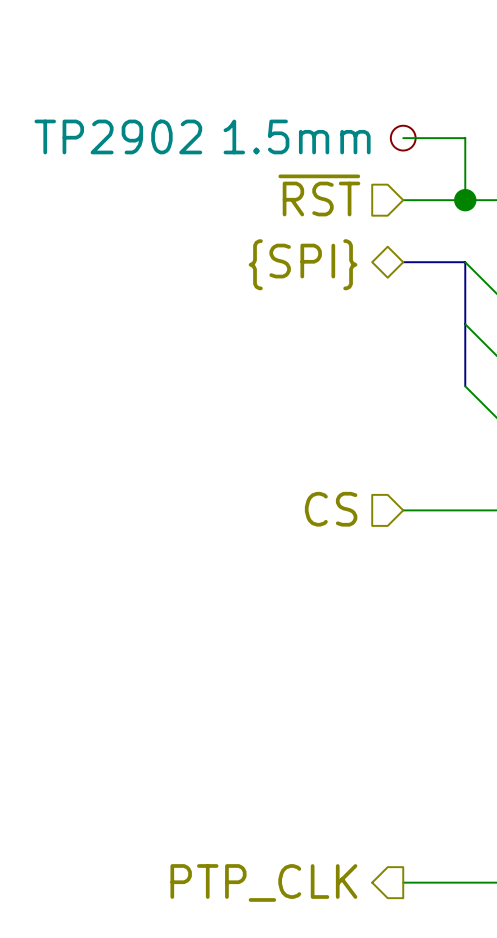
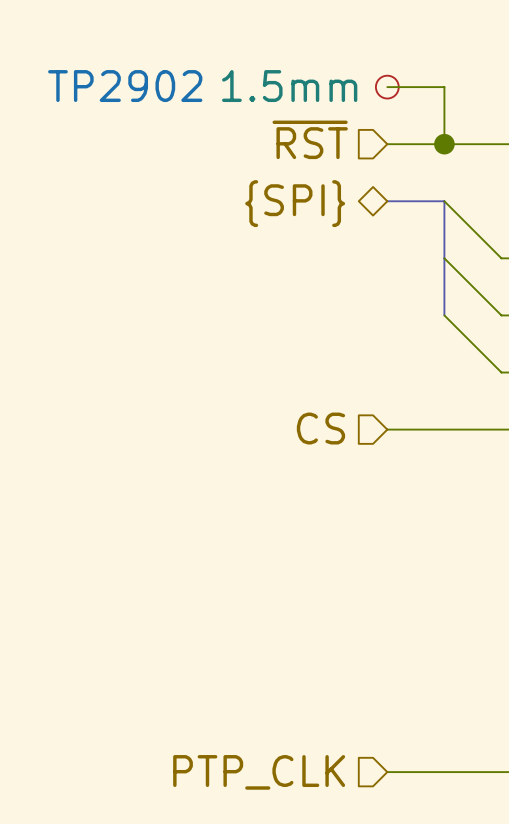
hierarchical label shape: output (263, 882) -> input (259, 772)

